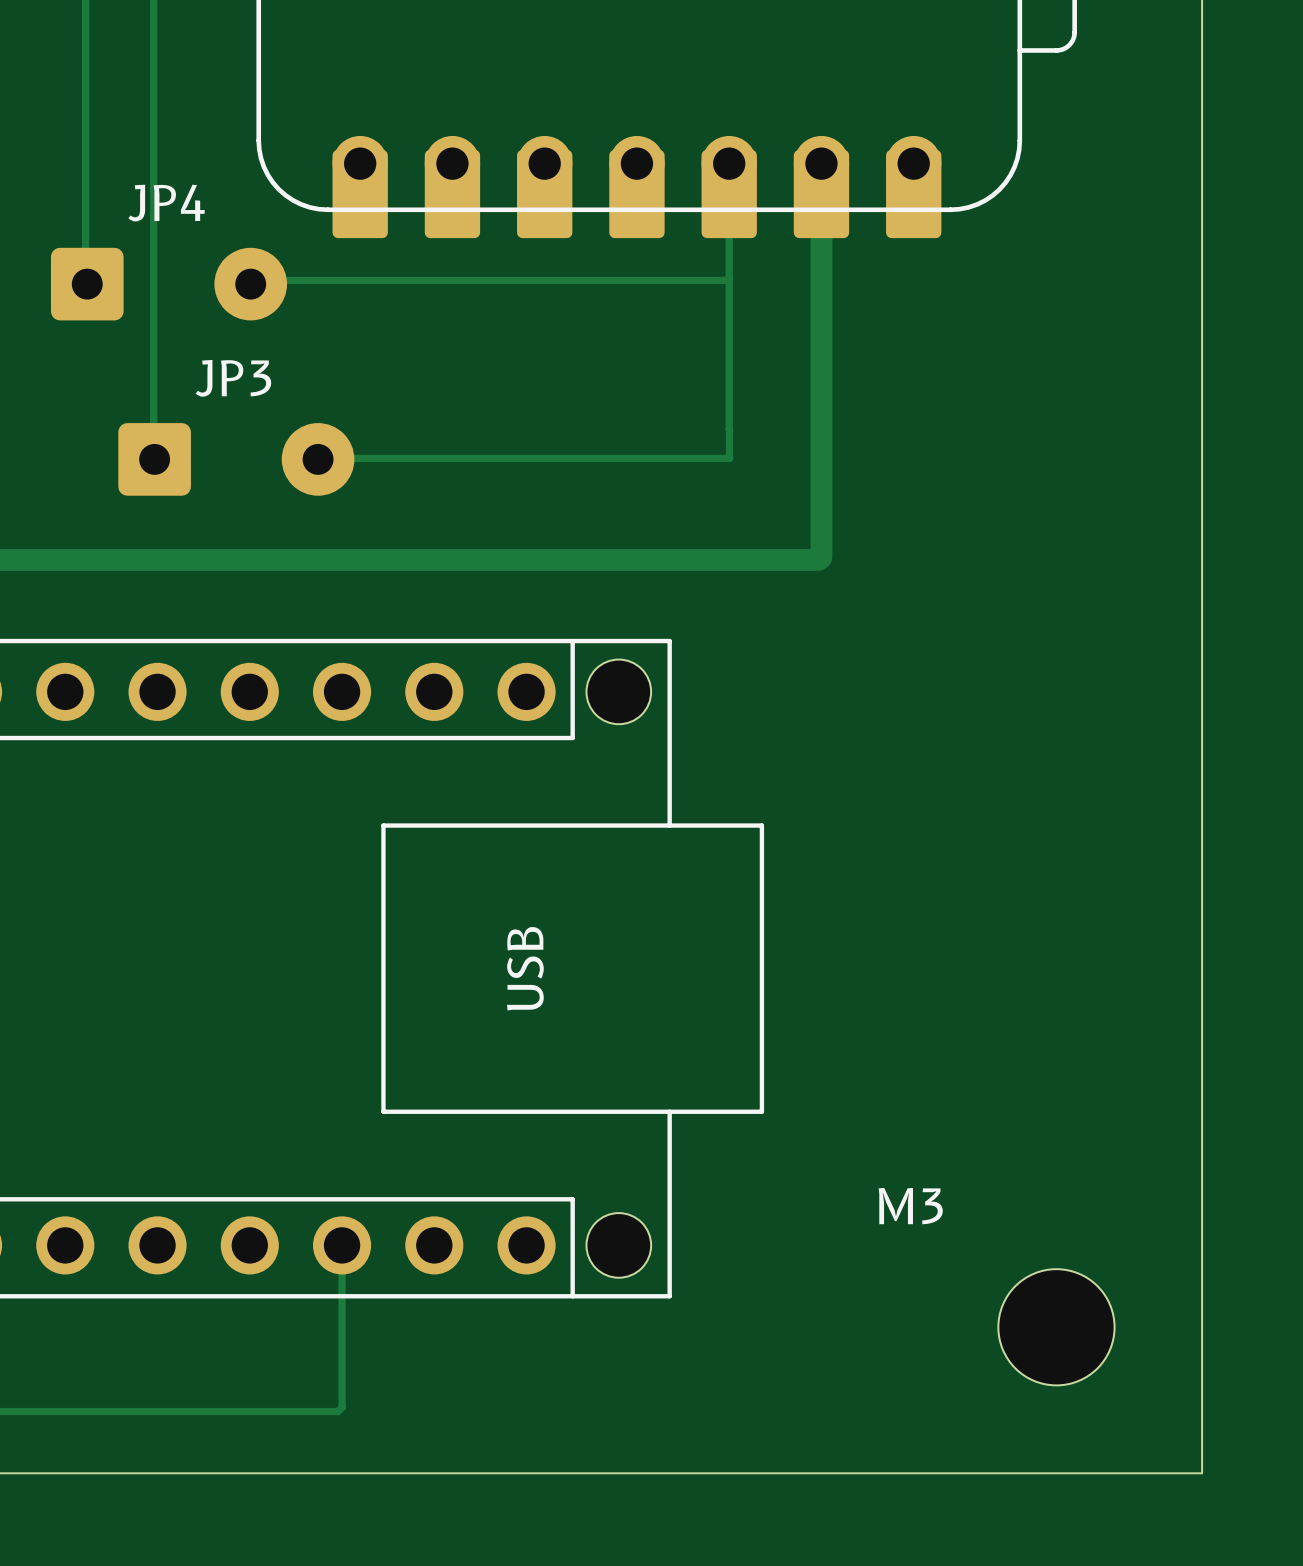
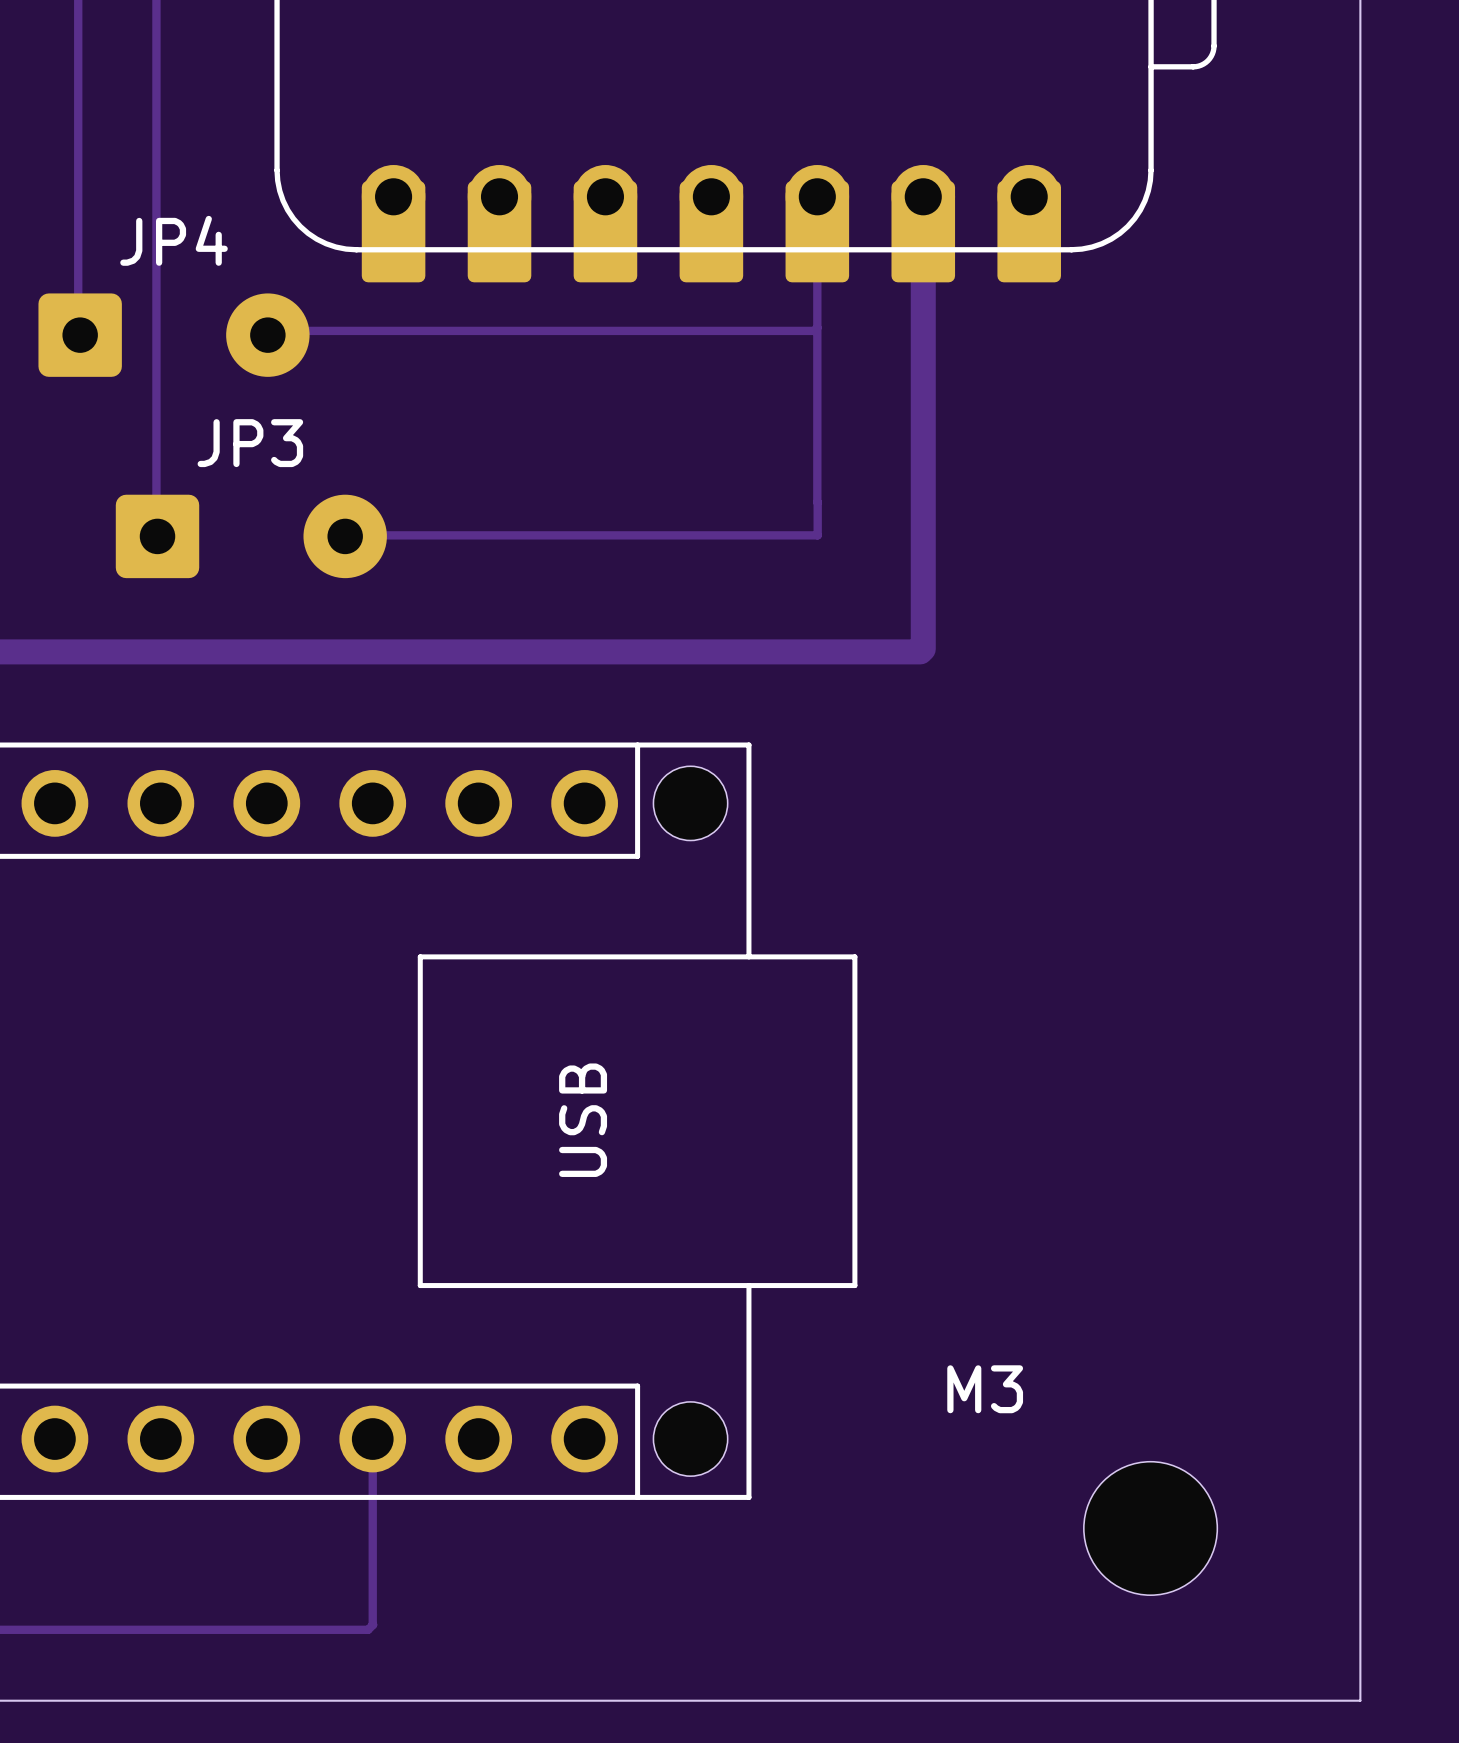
M3 position: (1056, 1327) -> (1150, 1528)

